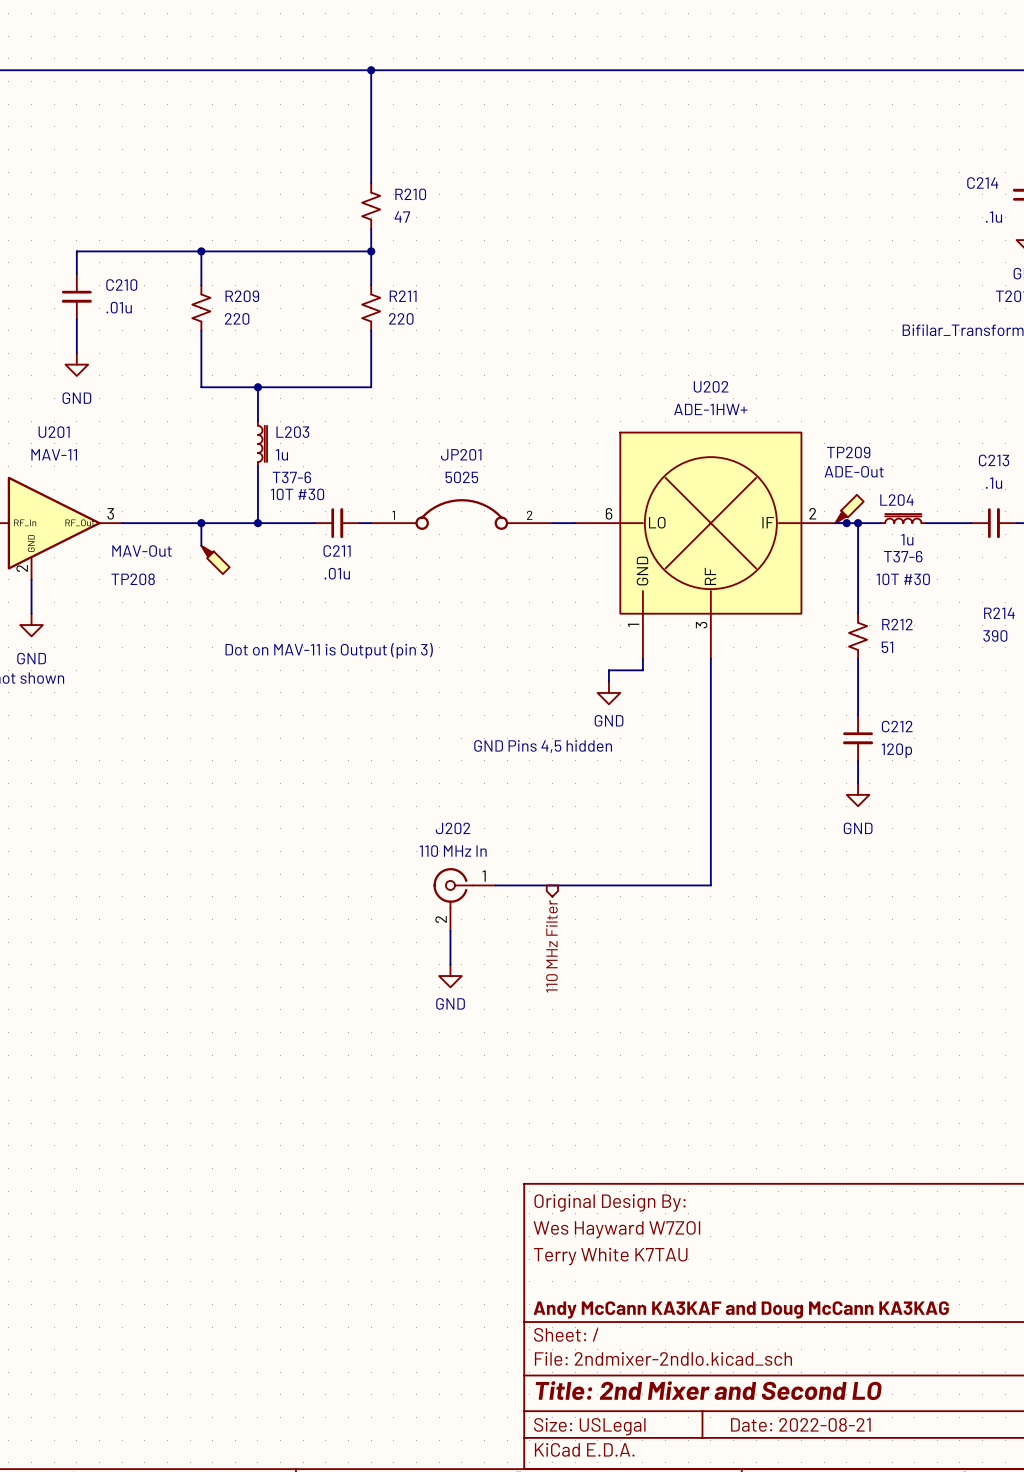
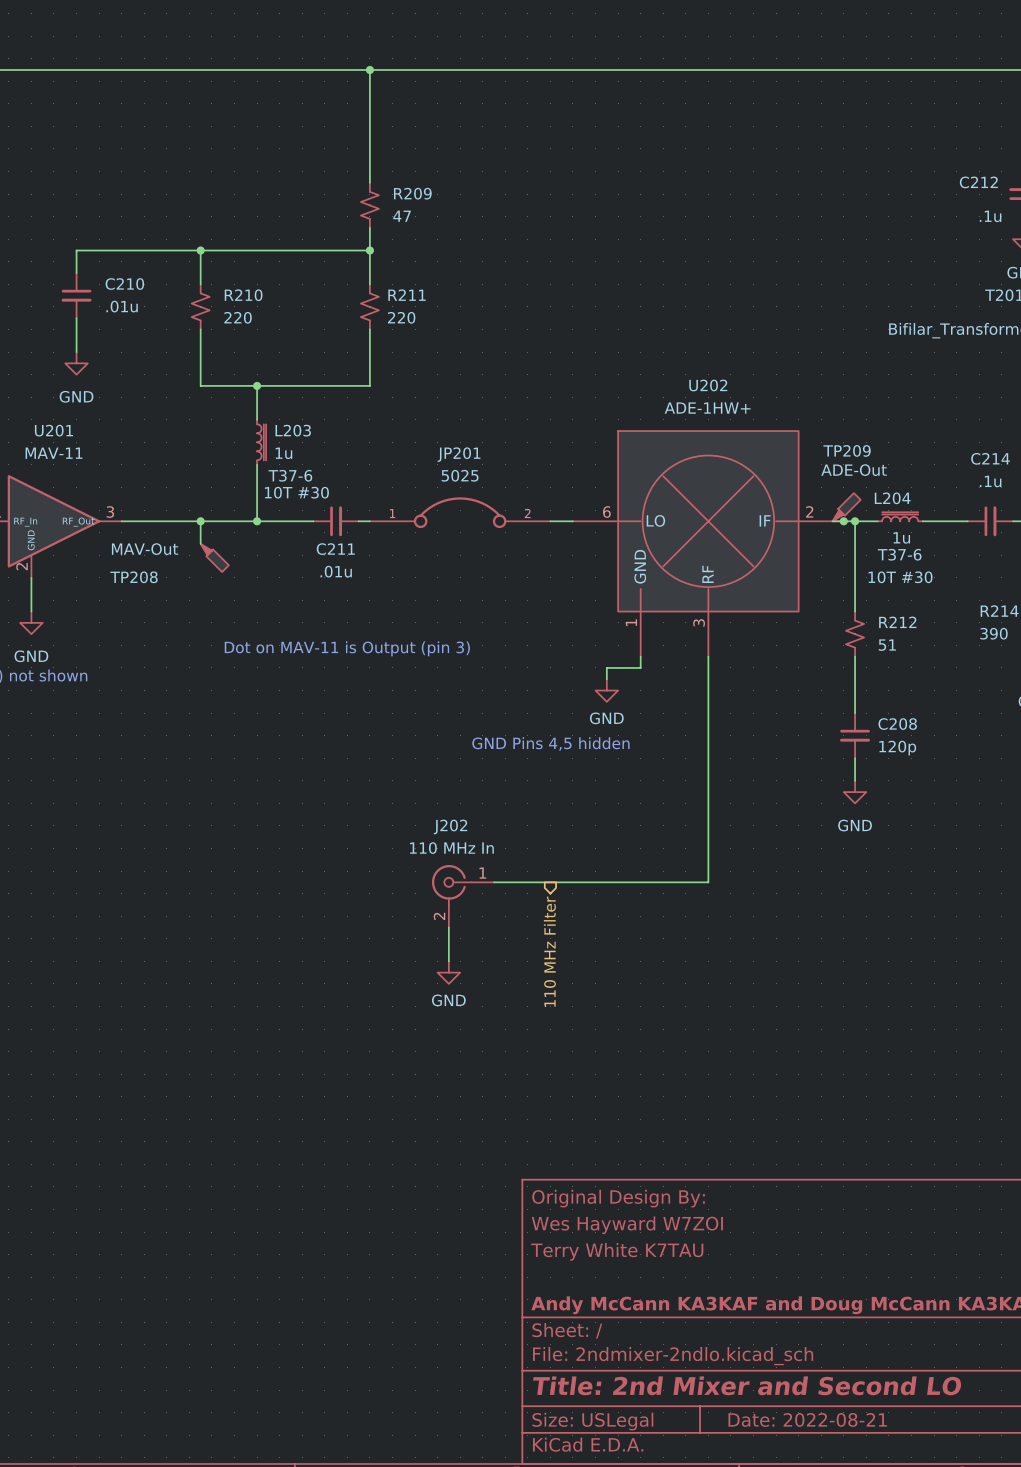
C214 name: C214 (982, 183) -> C212 (978, 182)
R210 name: R210 (410, 194) -> R209 (412, 193)
R209 name: R209 (242, 296) -> R210 (243, 295)
C213 name: C213 (994, 460) -> C214 (990, 458)
C212 name: C212 (897, 726) -> C208 (897, 724)

